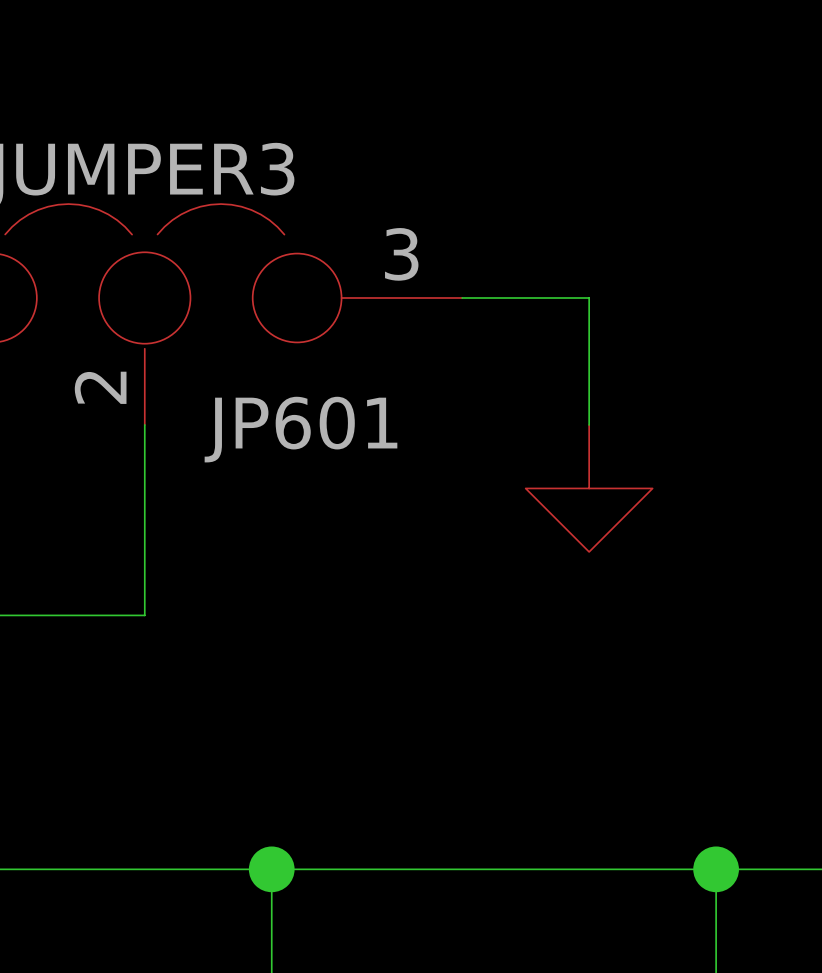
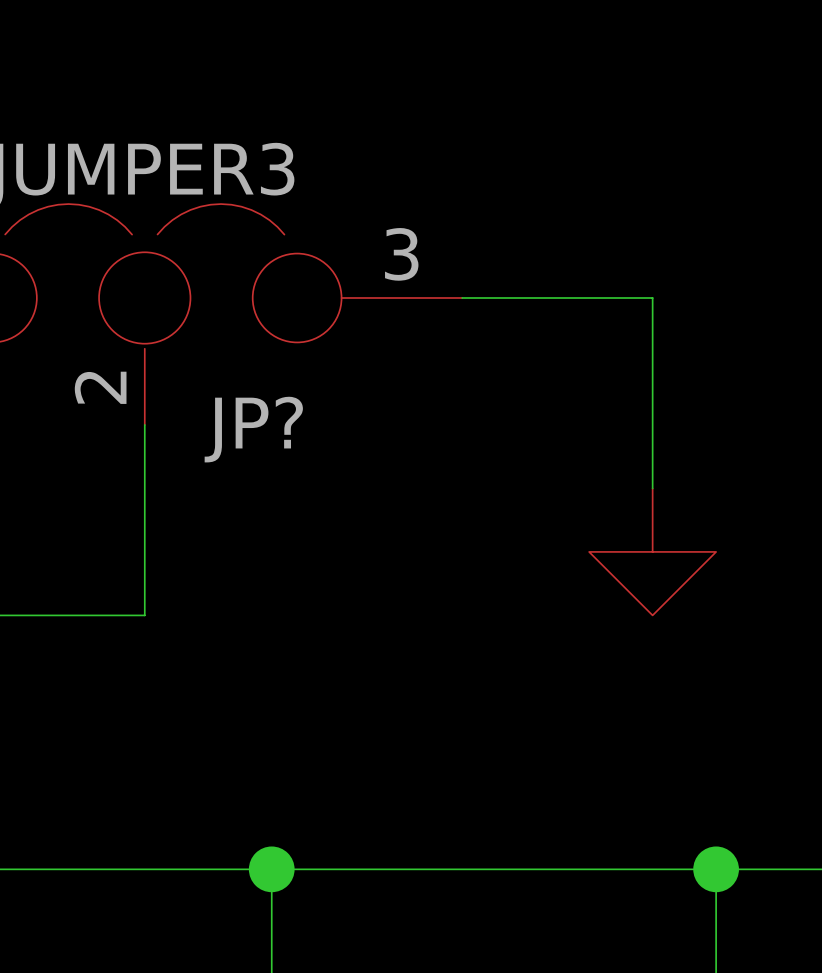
wire: (589, 298) (589, 424) -> (589, 298) (652, 298) (652, 488)
JP601 name: JP601 (300, 429) -> JP? (253, 429)
power symbol position: (589, 488) -> (652, 551)

